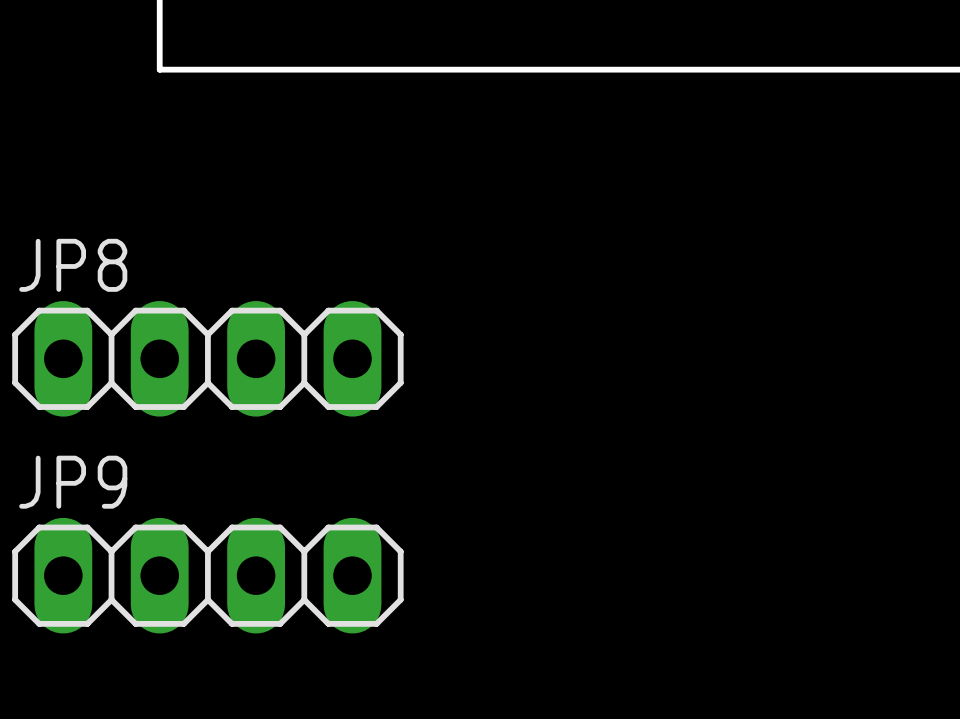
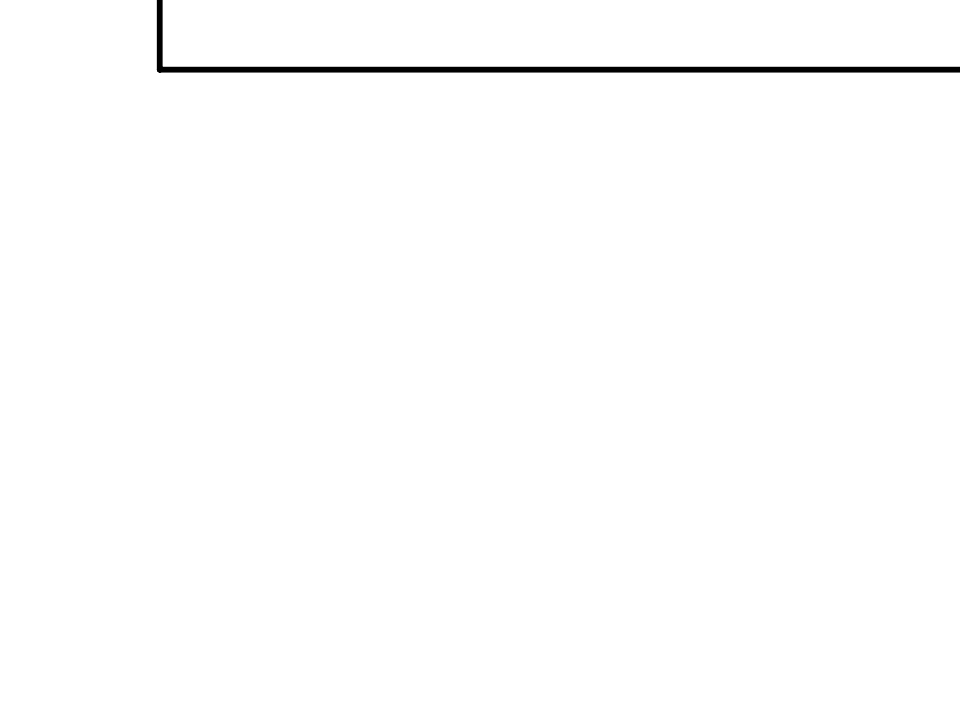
JP8: (207, 358) -> none
JP9: (207, 575) -> none

